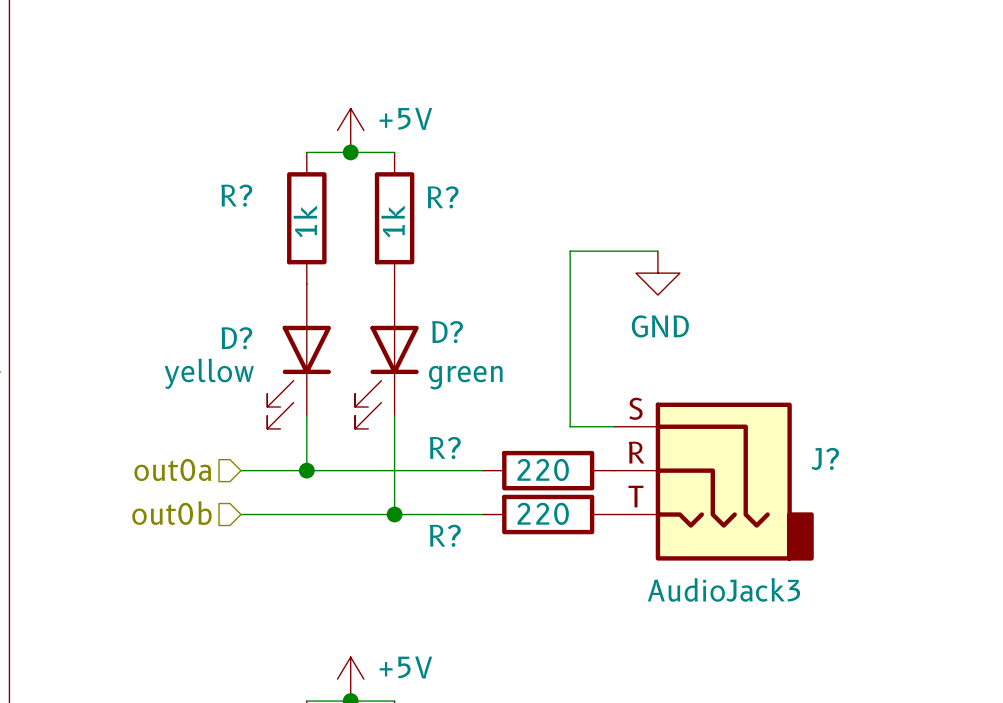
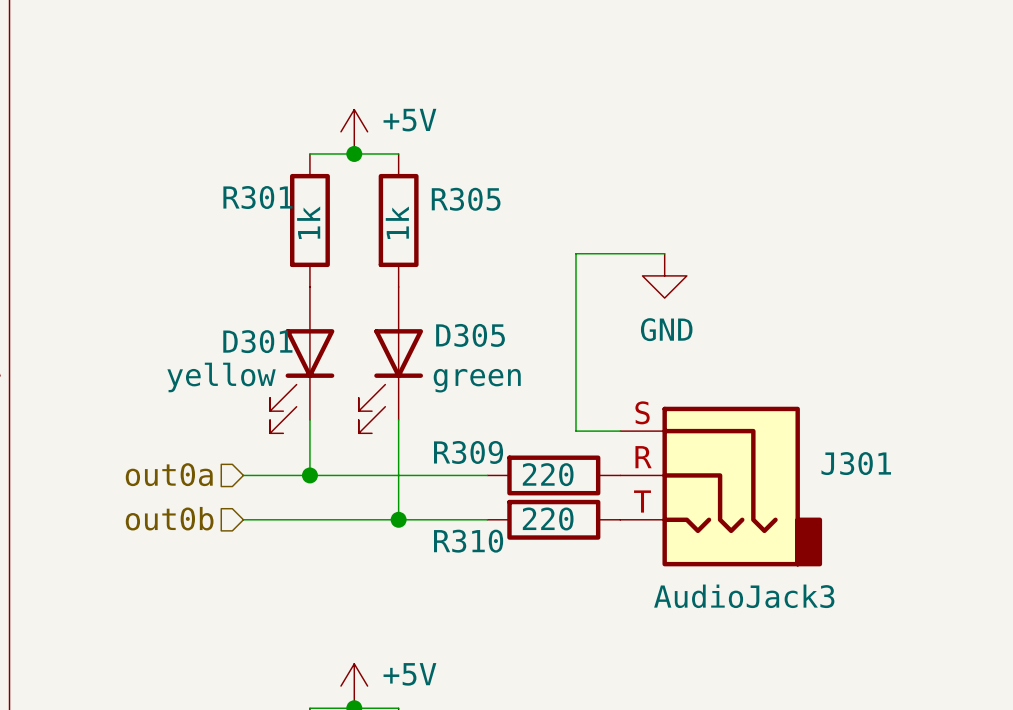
R? name: R? (236, 195) -> R301 (257, 197)
R? name: R? (443, 197) -> R305 (466, 199)
D? name: D? (447, 332) -> D305 (470, 335)
D? name: D? (236, 338) -> D301 (257, 341)
R? name: R? (445, 447) -> R309 (468, 452)
J? name: J? (825, 458) -> J301 (856, 463)
R? name: R? (445, 535) -> R310 (468, 541)

